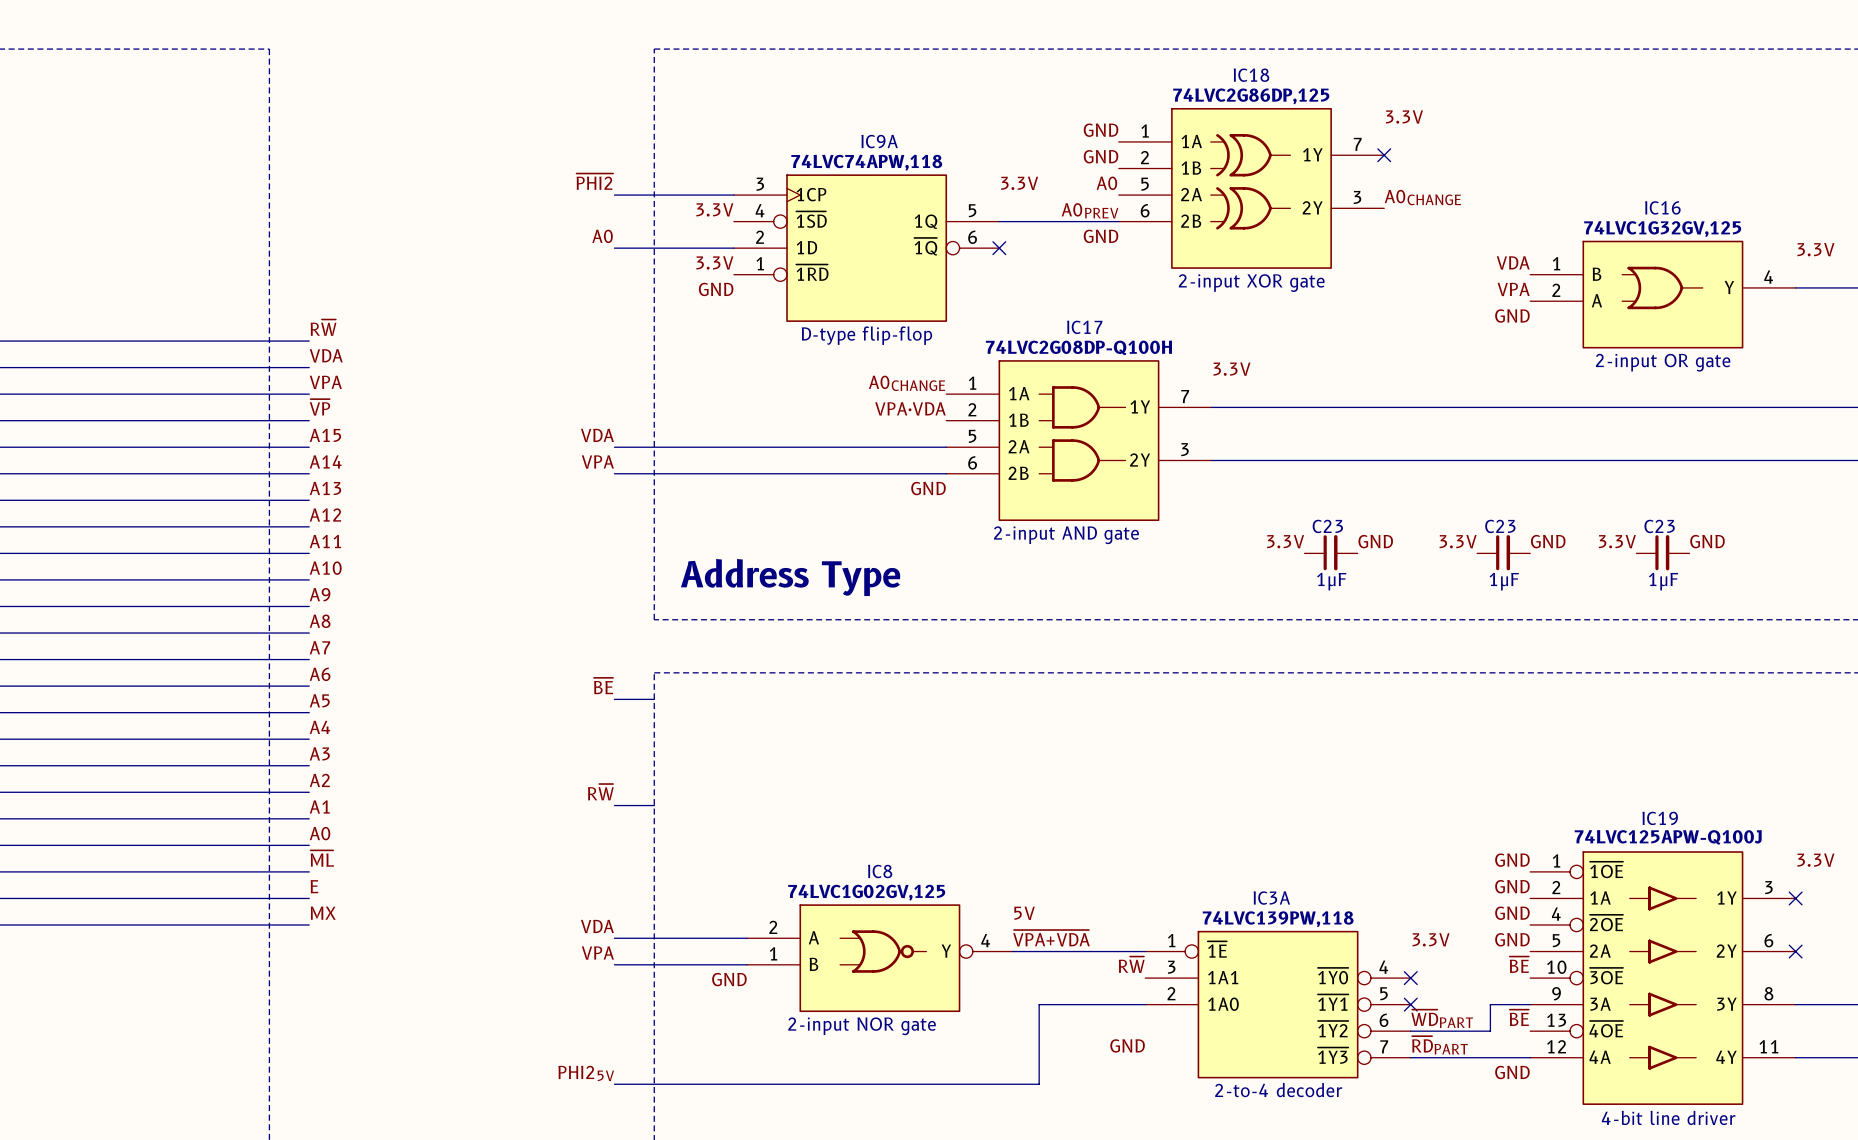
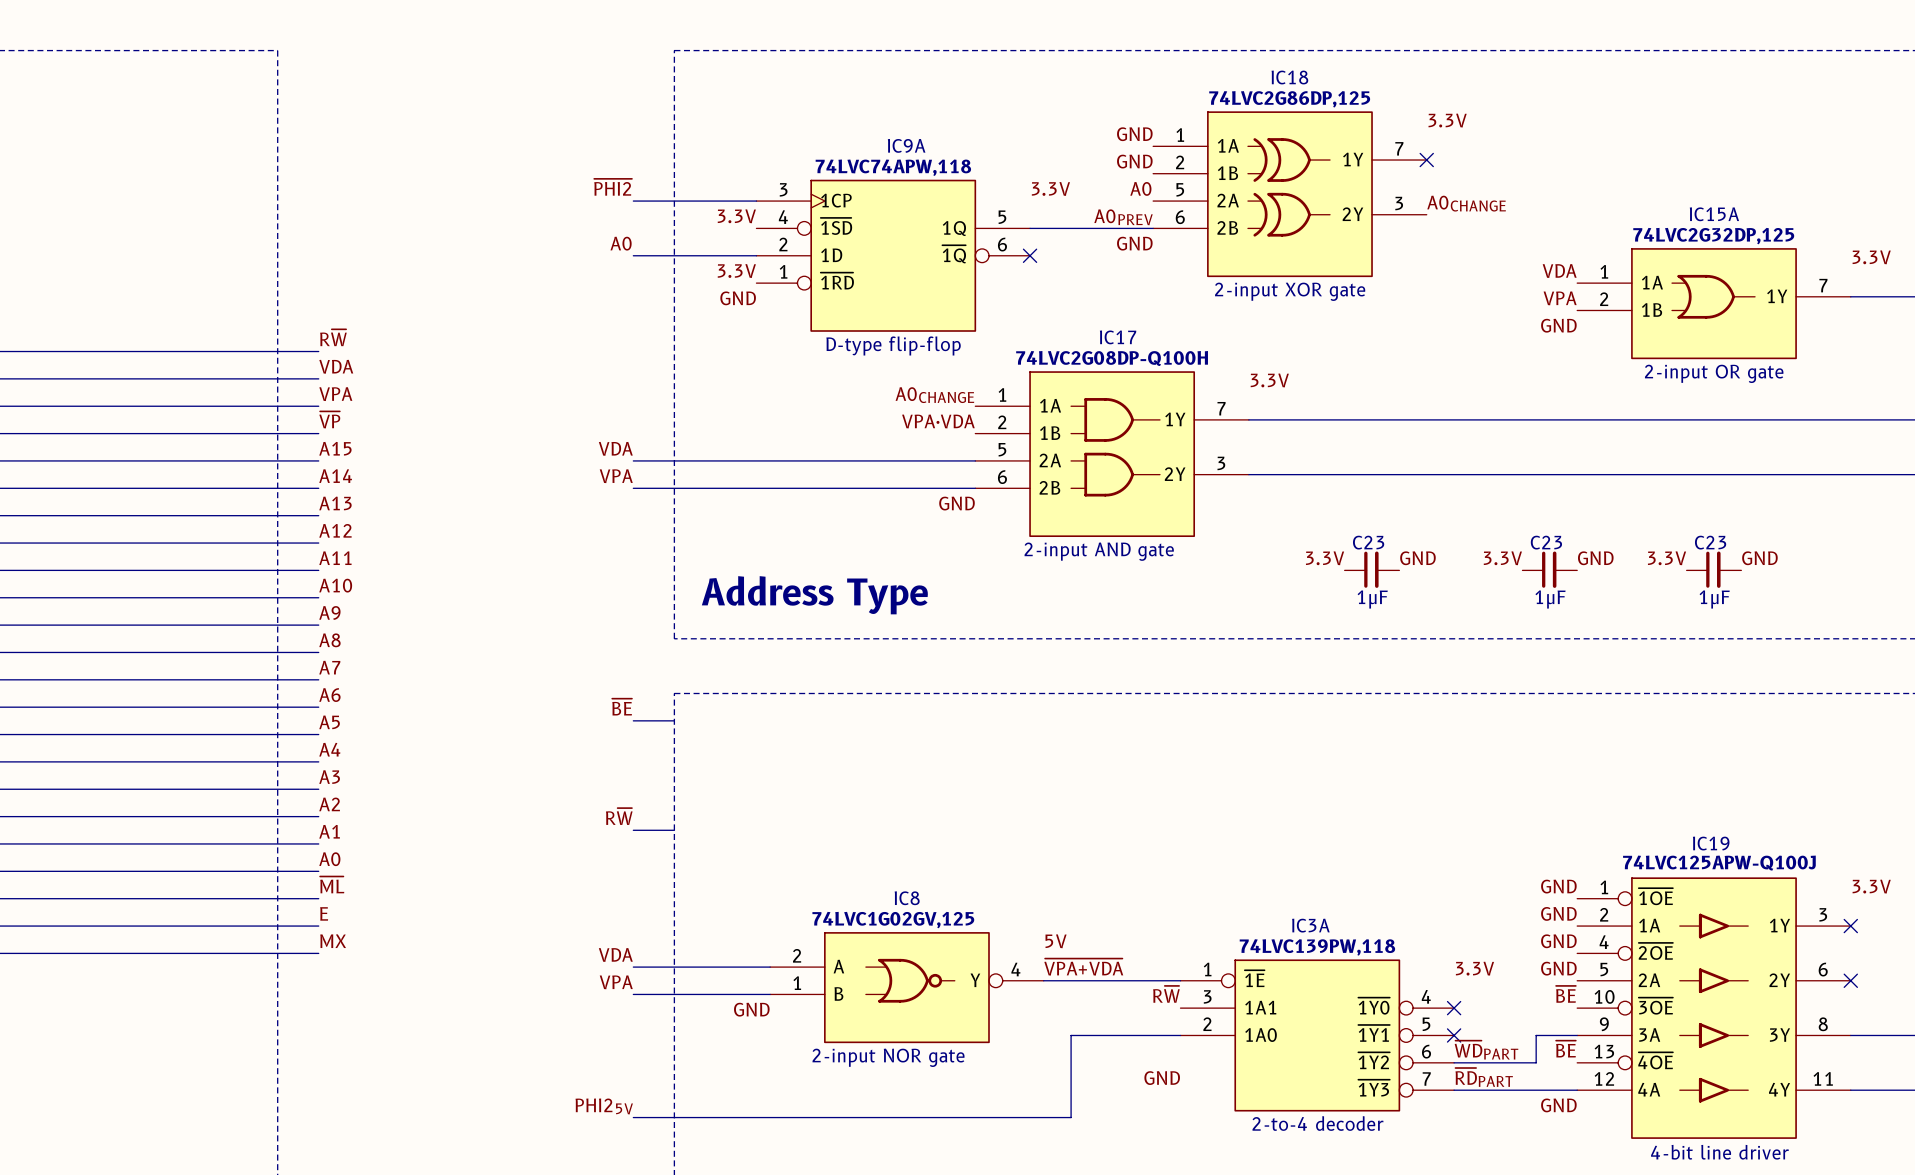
IC16 name: IC16 (1662, 207) -> IC15A (1714, 214)
IC16 value: 74LVC1G32GV,125 (1662, 229) -> 74LVC2G32DP,125 (1713, 236)
IC16 pin name: B (1596, 274) -> 1A (1652, 282)
IC16 pin number: 4 (1768, 277) -> 7 (1823, 285)
IC16 pin name: Y (1729, 287) -> 1Y (1777, 296)
IC16 pin name: A (1596, 300) -> 1B (1652, 309)

